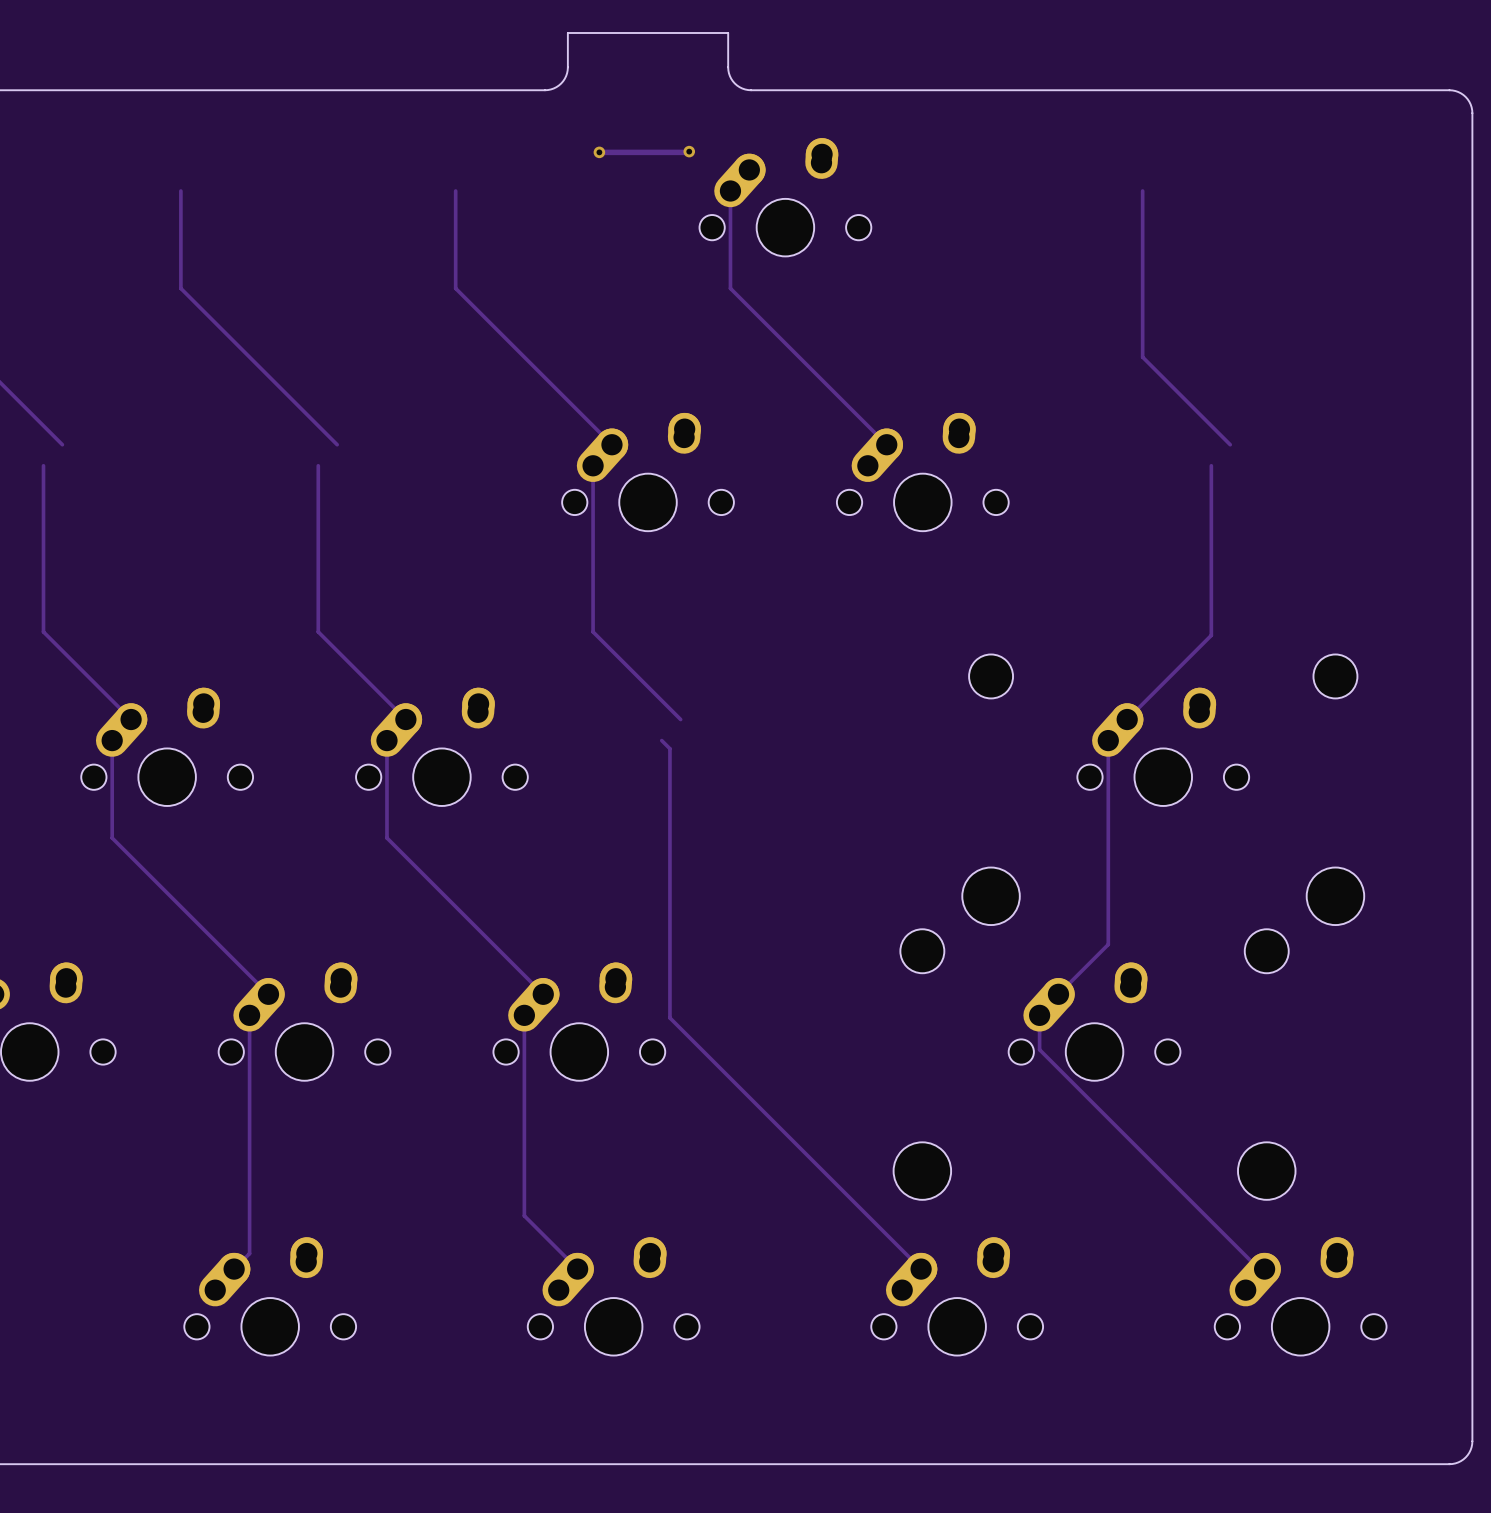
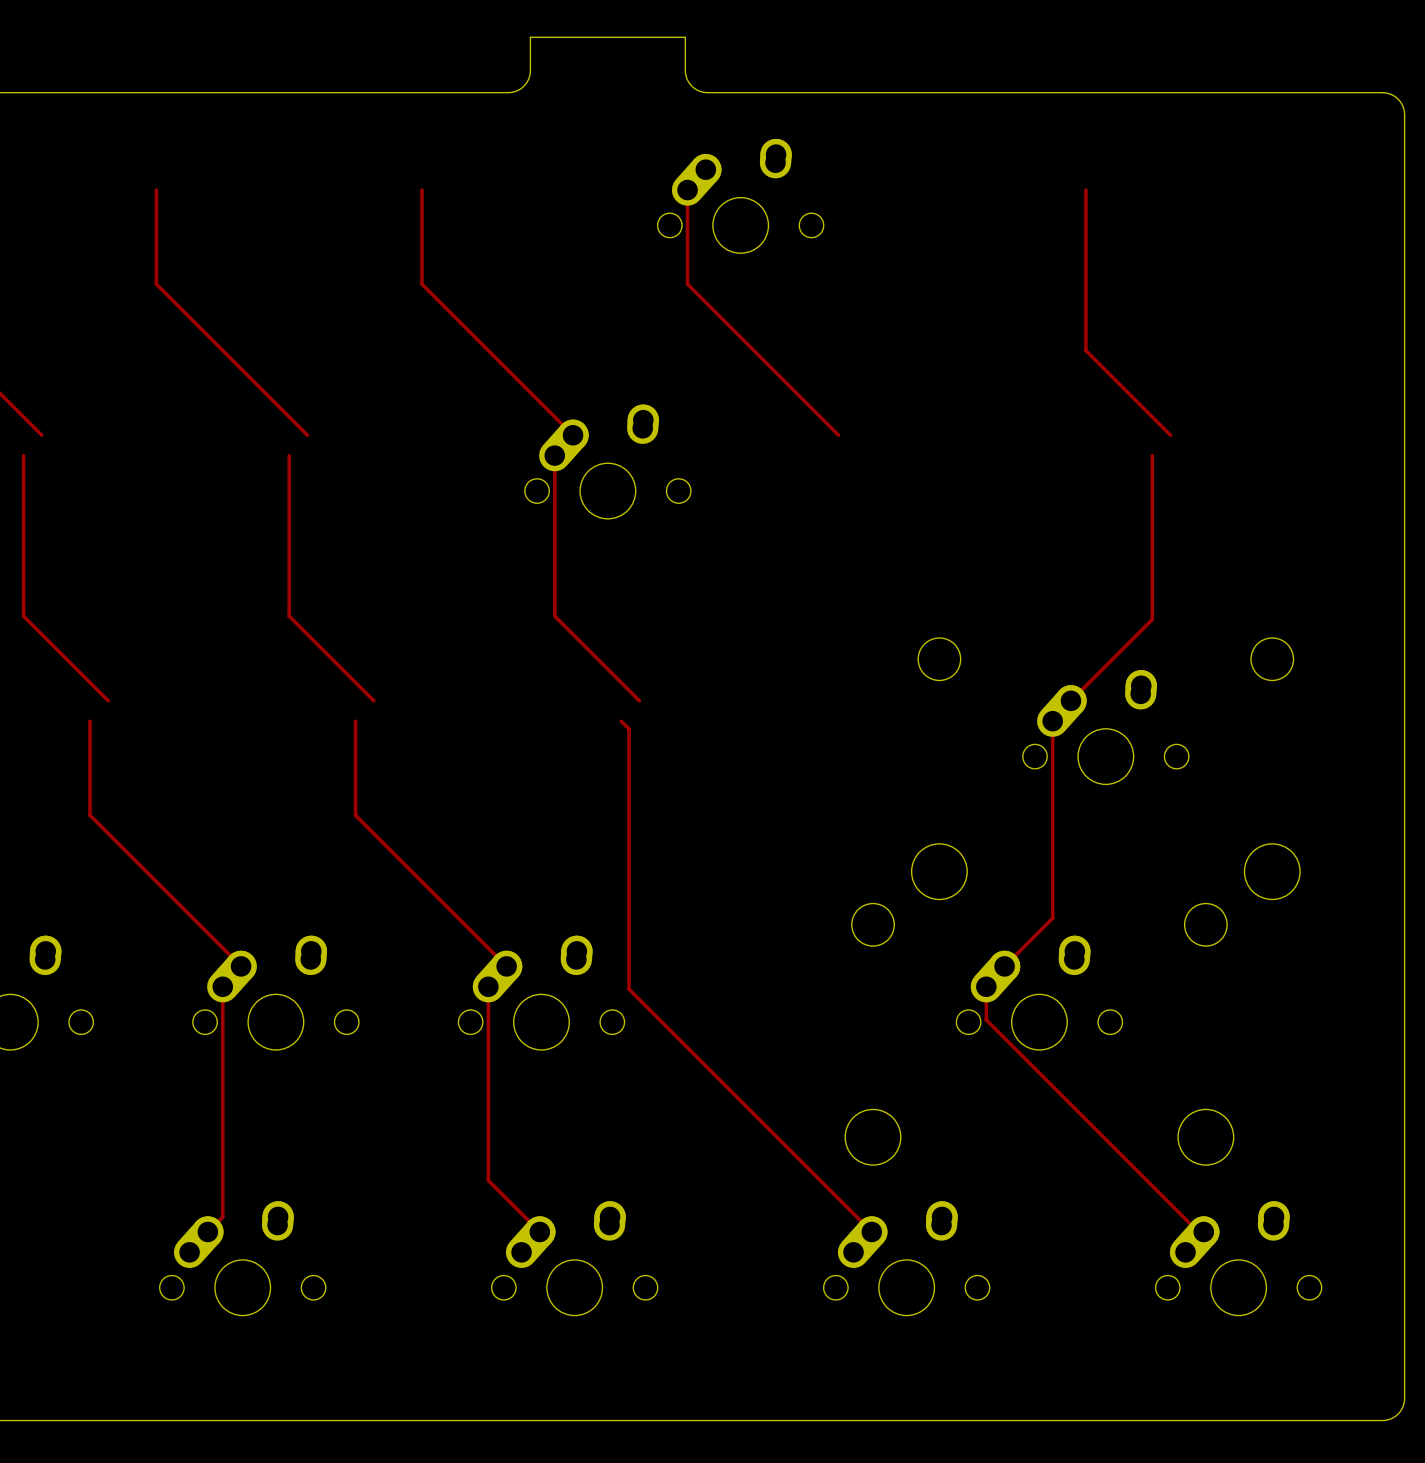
track: (689, 151) (599, 152) -> none
via: (689, 151) -> none
via: (599, 152) -> none
part: (922, 472) -> none
part: (167, 746) -> none
part: (441, 746) -> none

